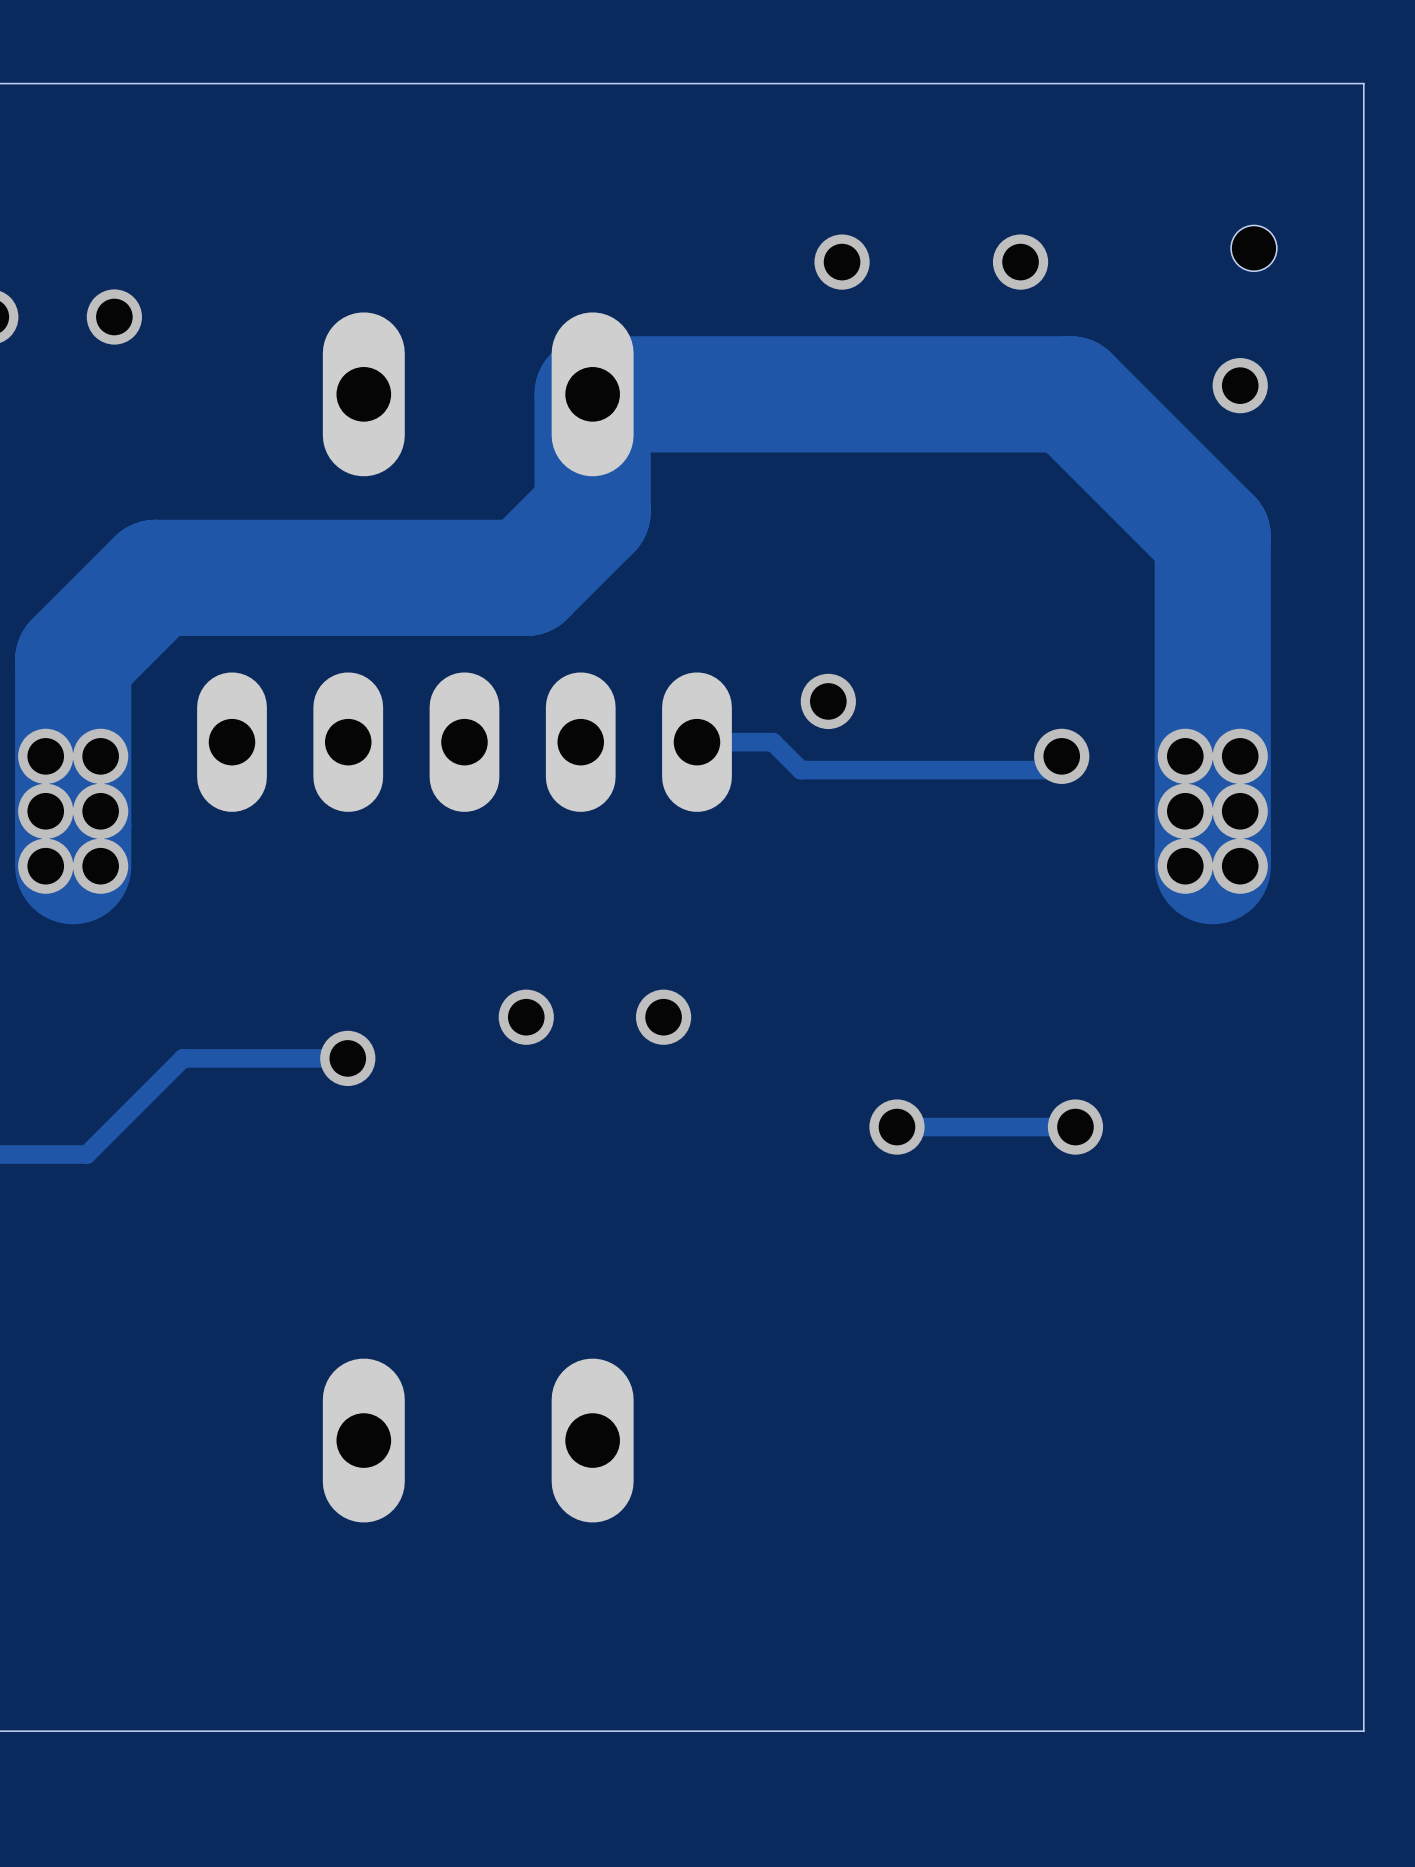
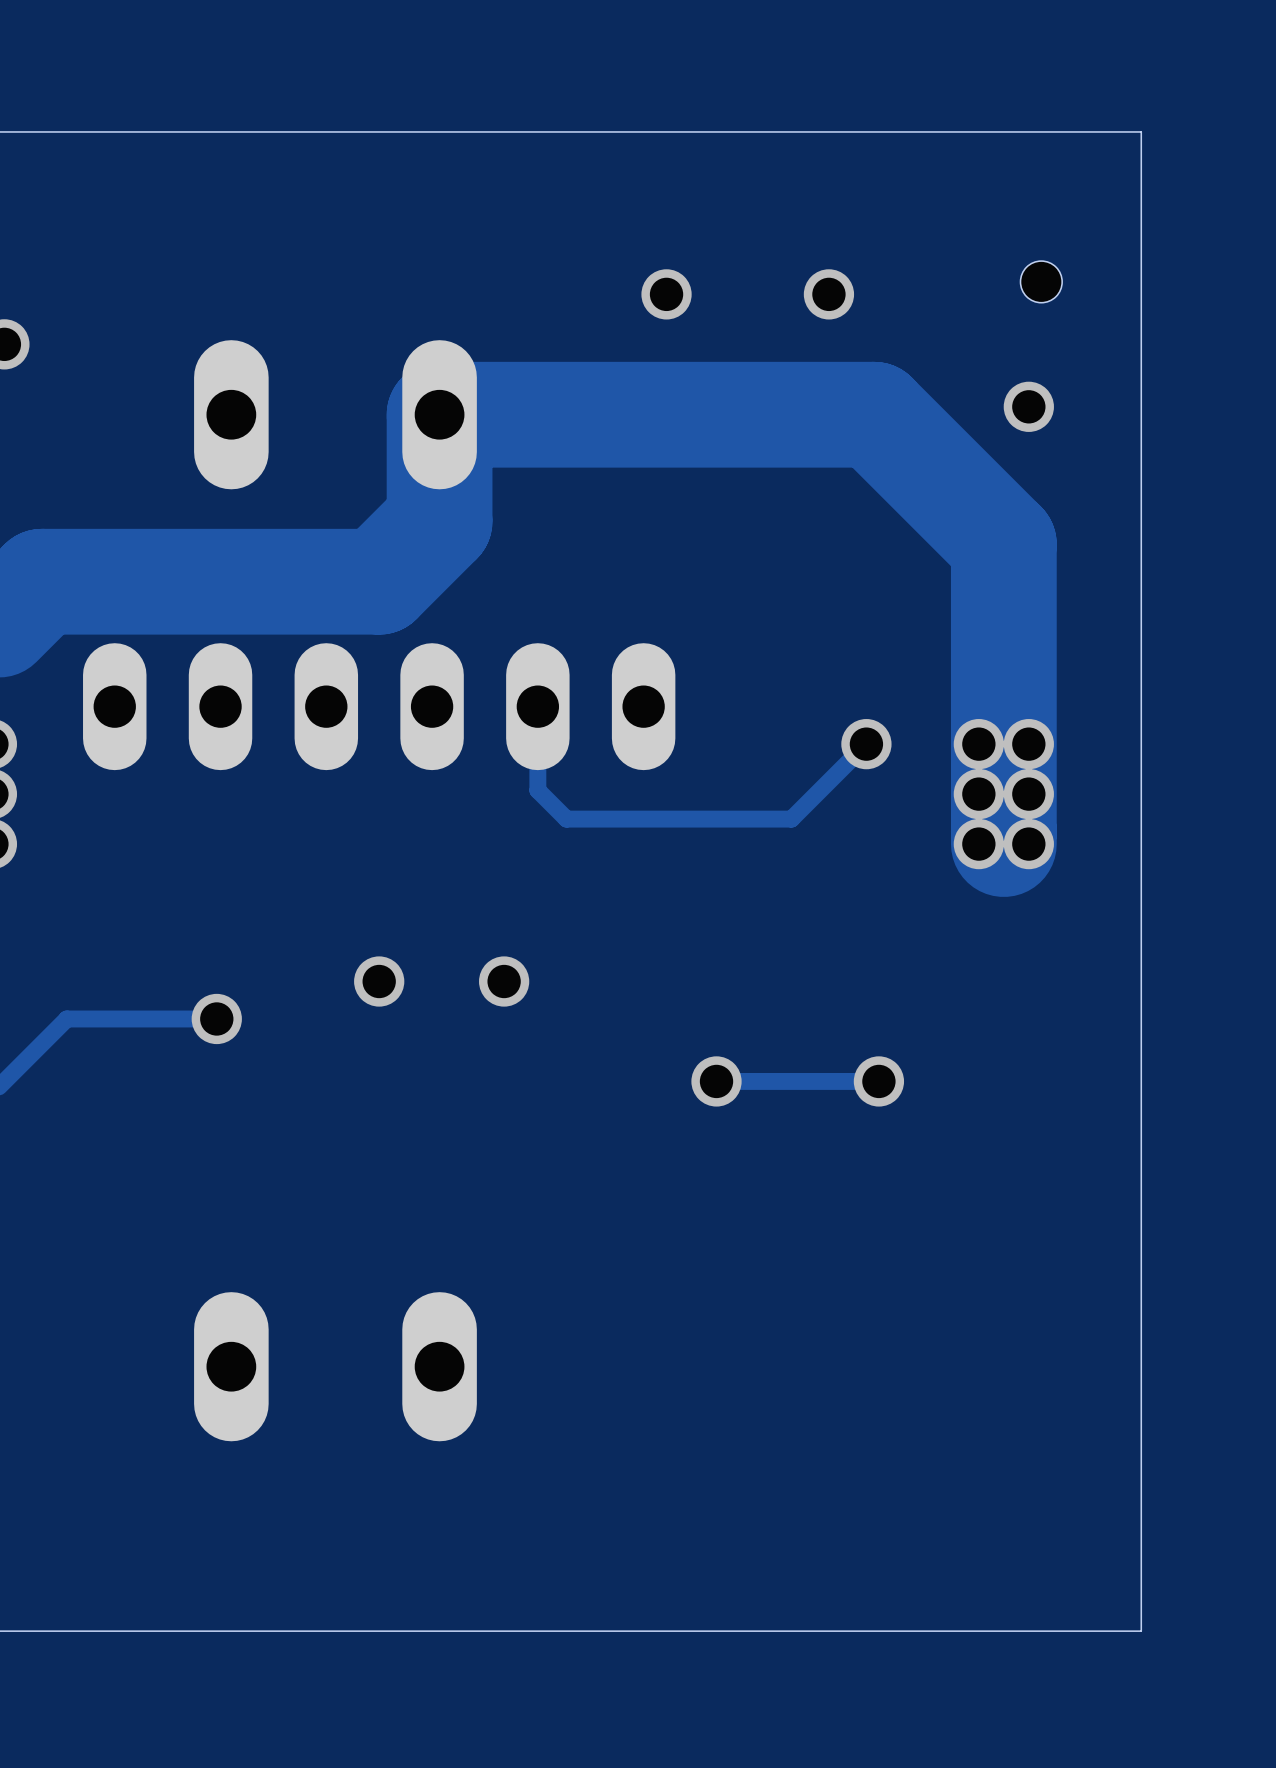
via: (828, 701) -> none
part: none -> (379, 706)
part: (464, 742) -> none
track: (696, 742) (772, 742) (800, 770) (1048, 770) -> (537, 706) (537, 790) (566, 819) (791, 819) (853, 756)

